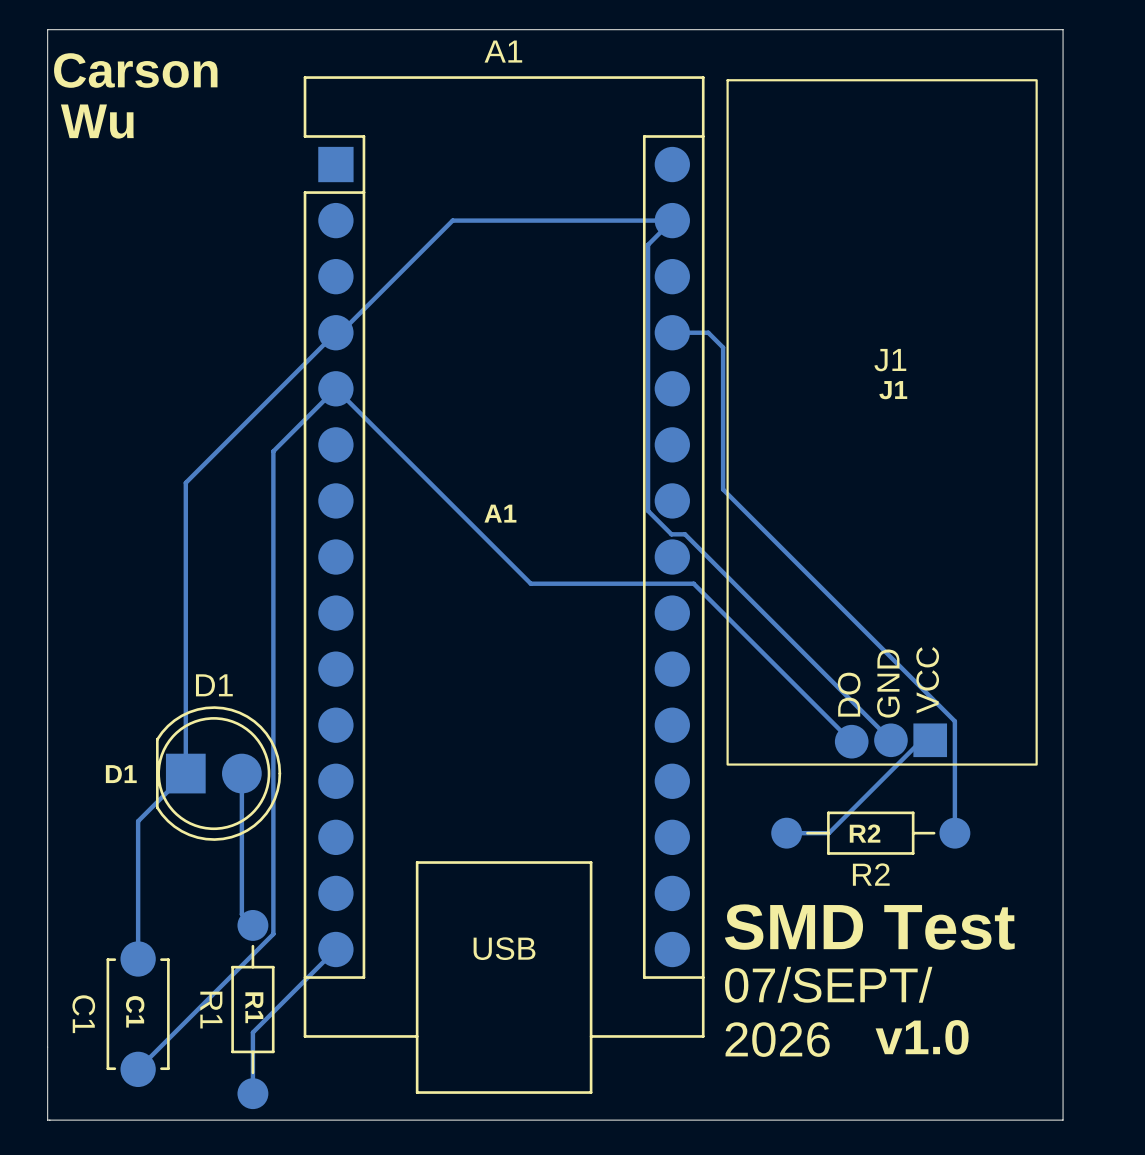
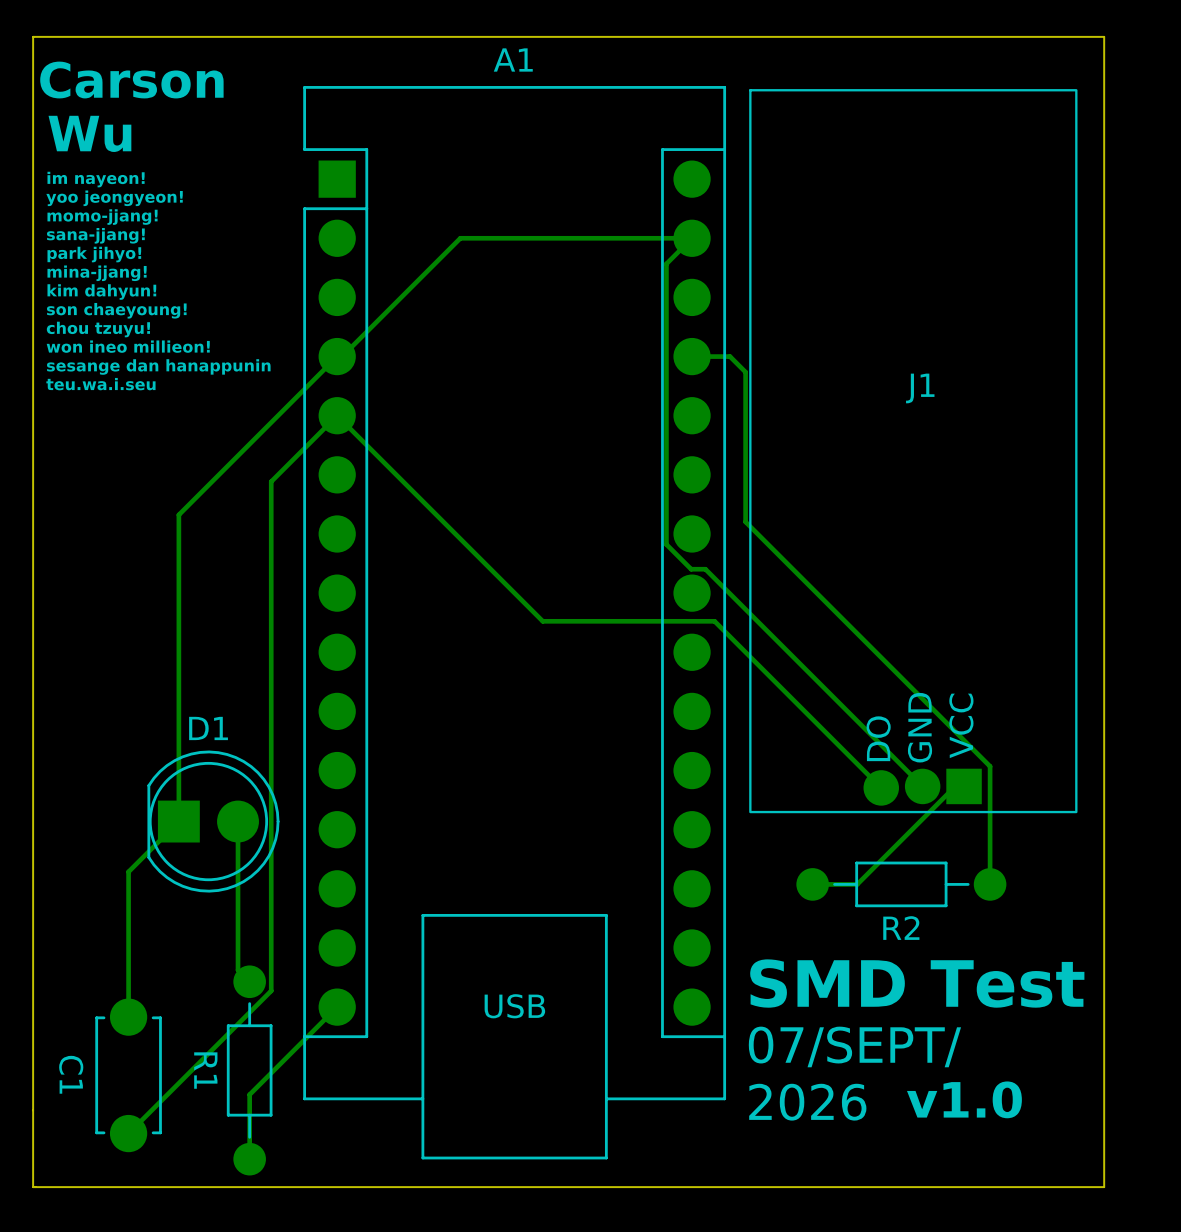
text: none -> im nayeon! (96, 179)
text: none -> yoo jeongyeon! (114, 198)
text: none -> momo-jjang! (102, 217)
text: none -> sana-jjang! (95, 235)
text: none -> park jihyo! (94, 254)
text: none -> mina-jjang! (97, 273)
text: none -> kim dahyun! (101, 292)
text: none -> son chaeyoung! (116, 310)
text: none -> chou tzuyu! (98, 329)
text: none -> won ineo millieon! (128, 346)
text: none -> sesange dan hanappunin (158, 366)
text: none -> teu.wa.i.seu (100, 384)
text: J1 (893, 390) -> none
text: A1 (500, 513) -> none
text: D1 (121, 774) -> none
text: R2 (865, 833) -> none
text: R1 (254, 1007) -> none
text: C1 (135, 1011) -> none

